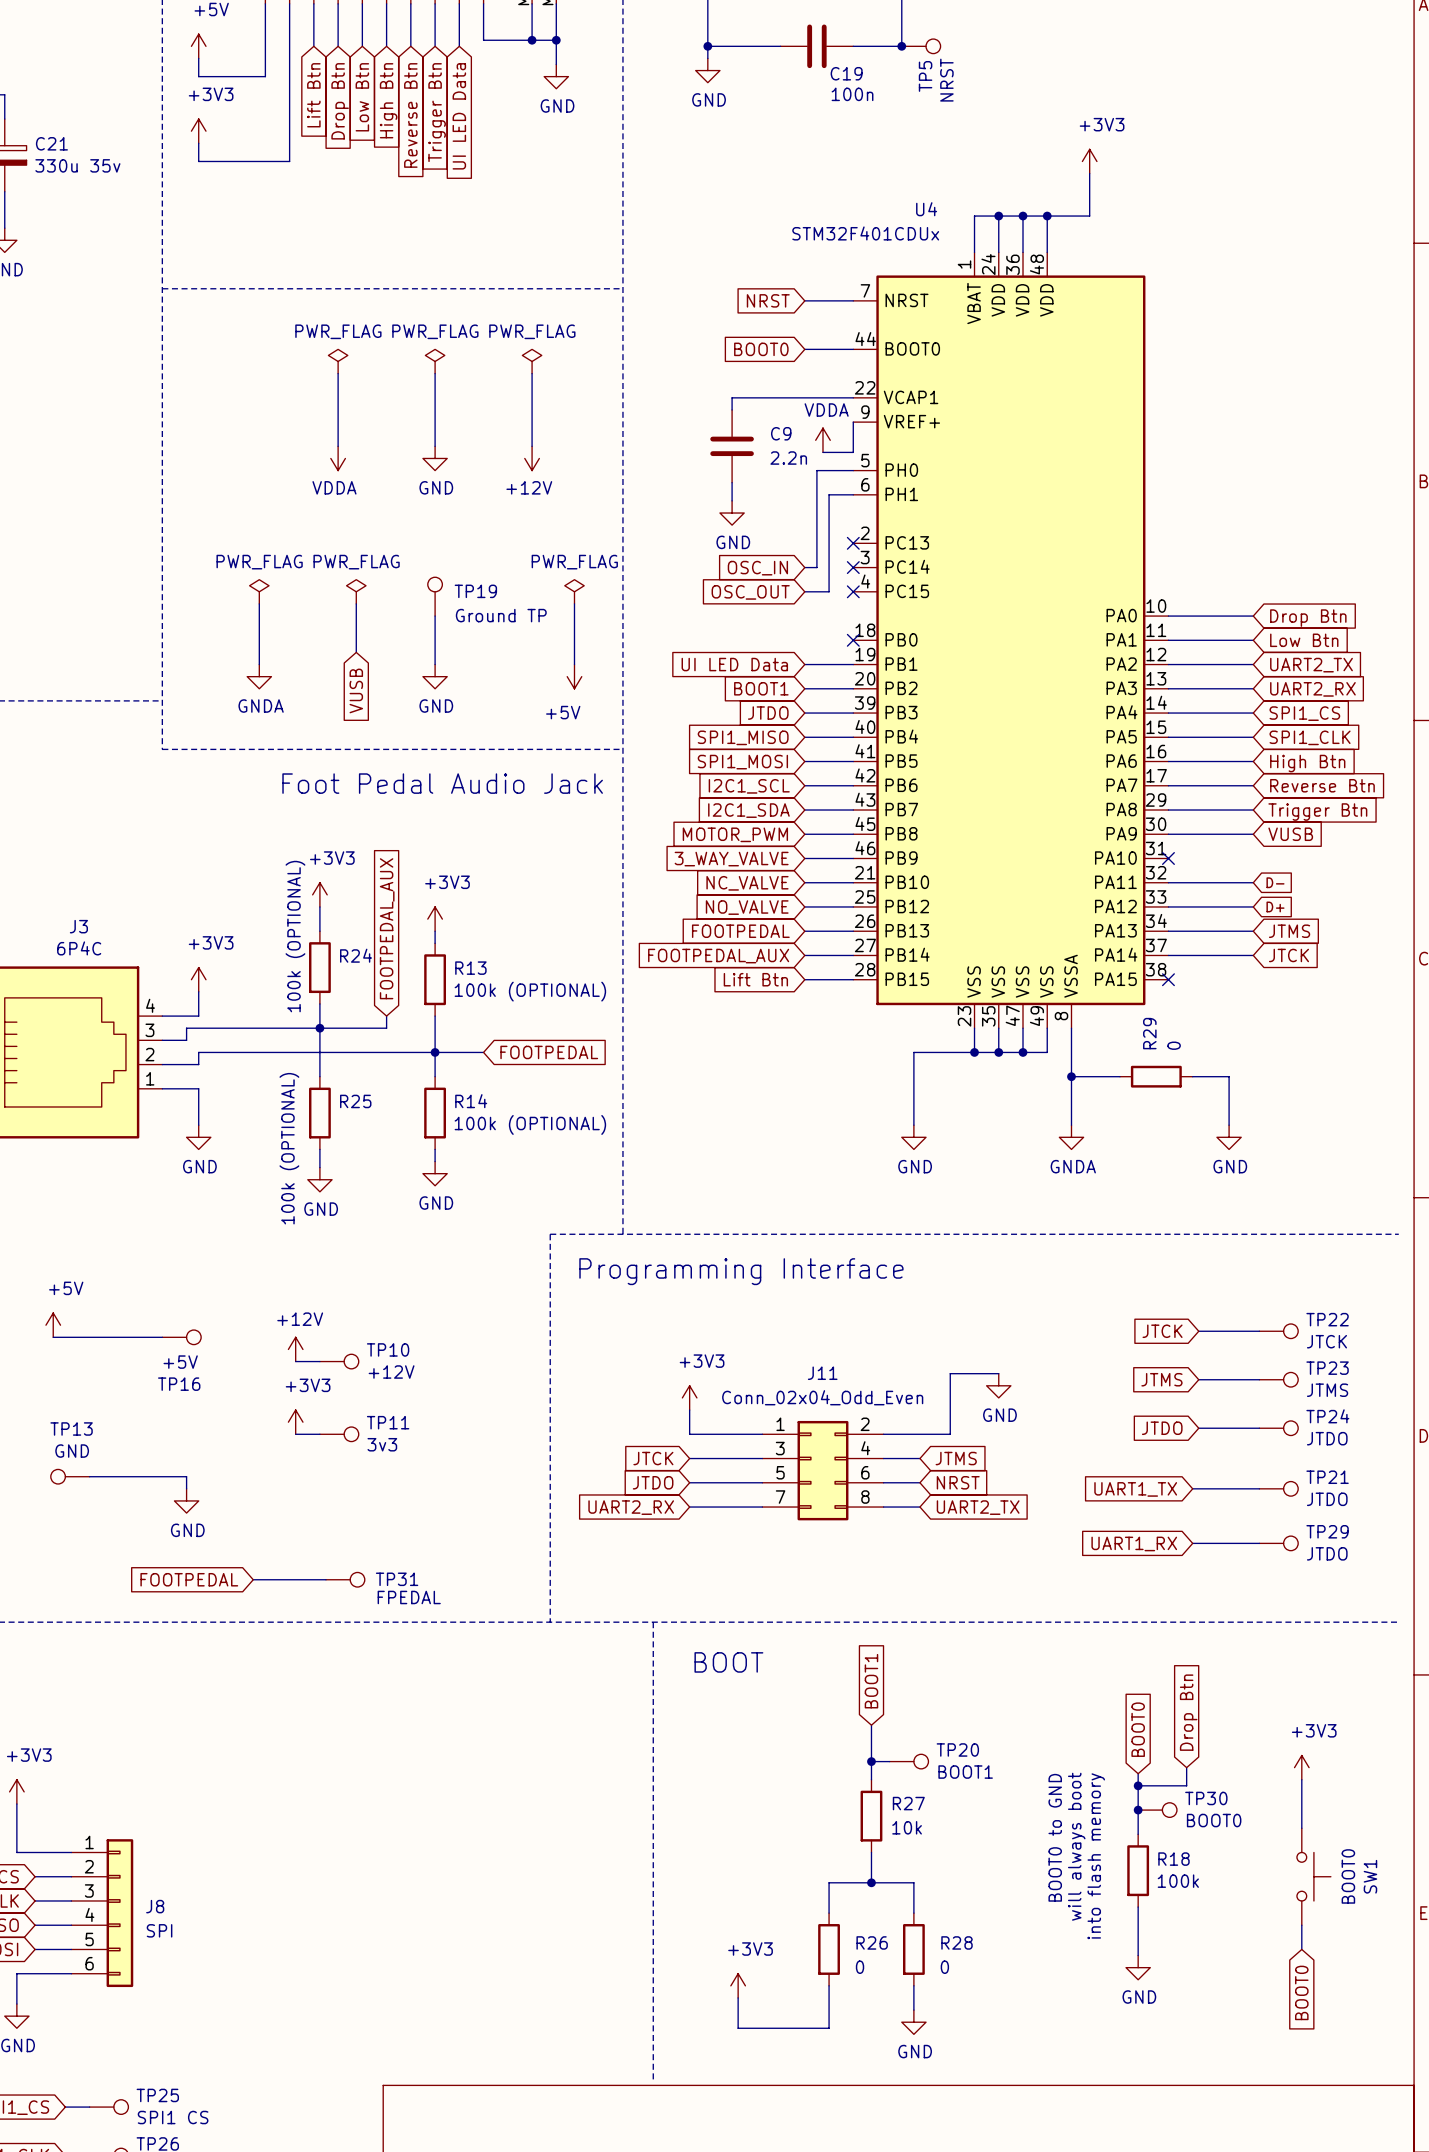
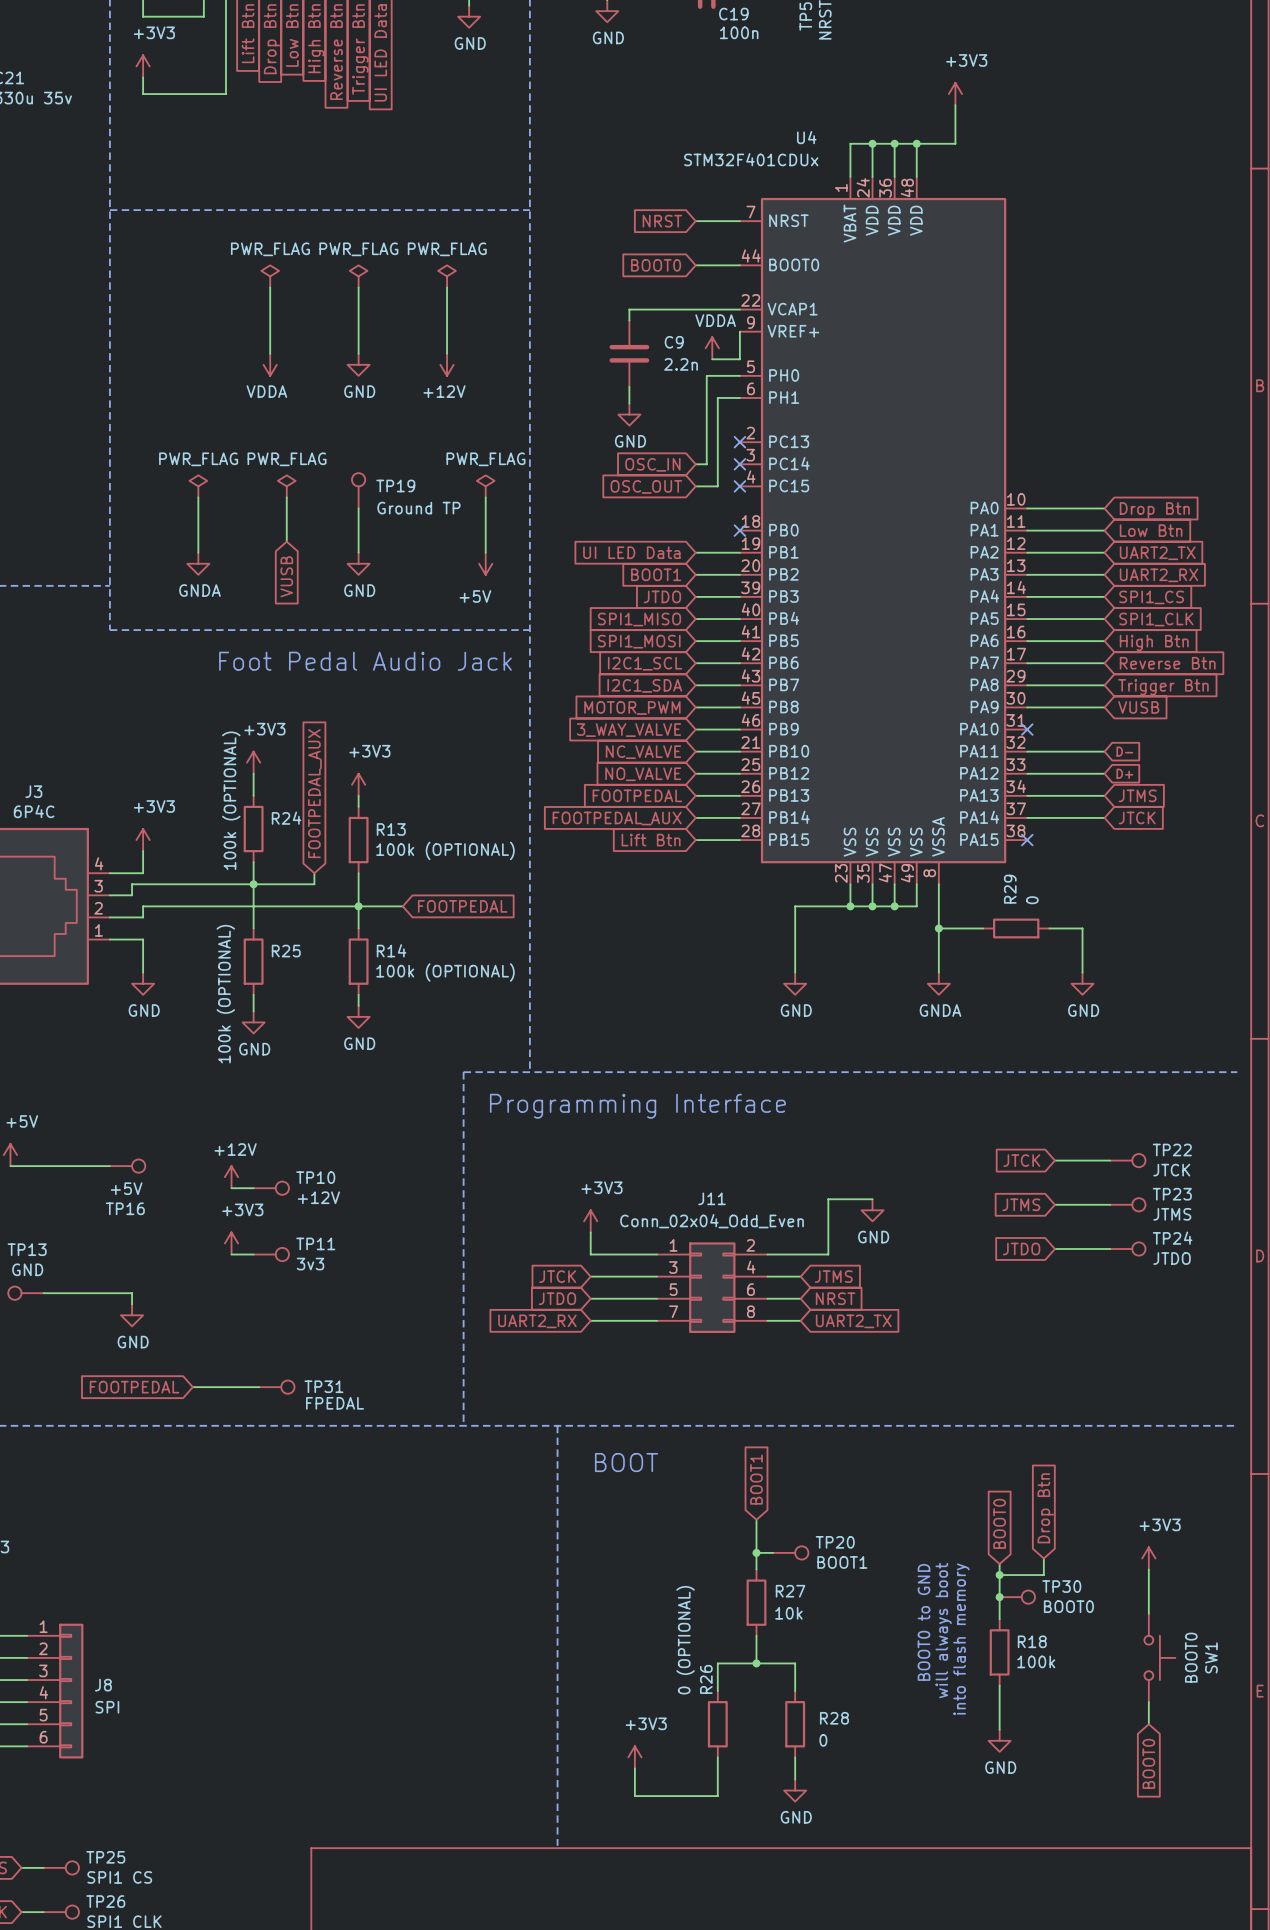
wire: (1192, 1488) (1259, 1488) -> none
TP21: JTDO (1278, 1488) -> none
global label: UART1_TX (1135, 1489) -> none
global label: UART1_RX (1134, 1543) -> none
wire: (1192, 1543) (1259, 1543) -> none
TP29: JTDO (1278, 1543) -> none
R26 name rotation: 0° (872, 1942) -> 90° counterclockwise (706, 1679)
R26 name position: R26 (872, 1942) -> R26 (706, 1679)
R26 value: 0 (860, 1967) -> 0 (OPTIONAL) (685, 1640)

